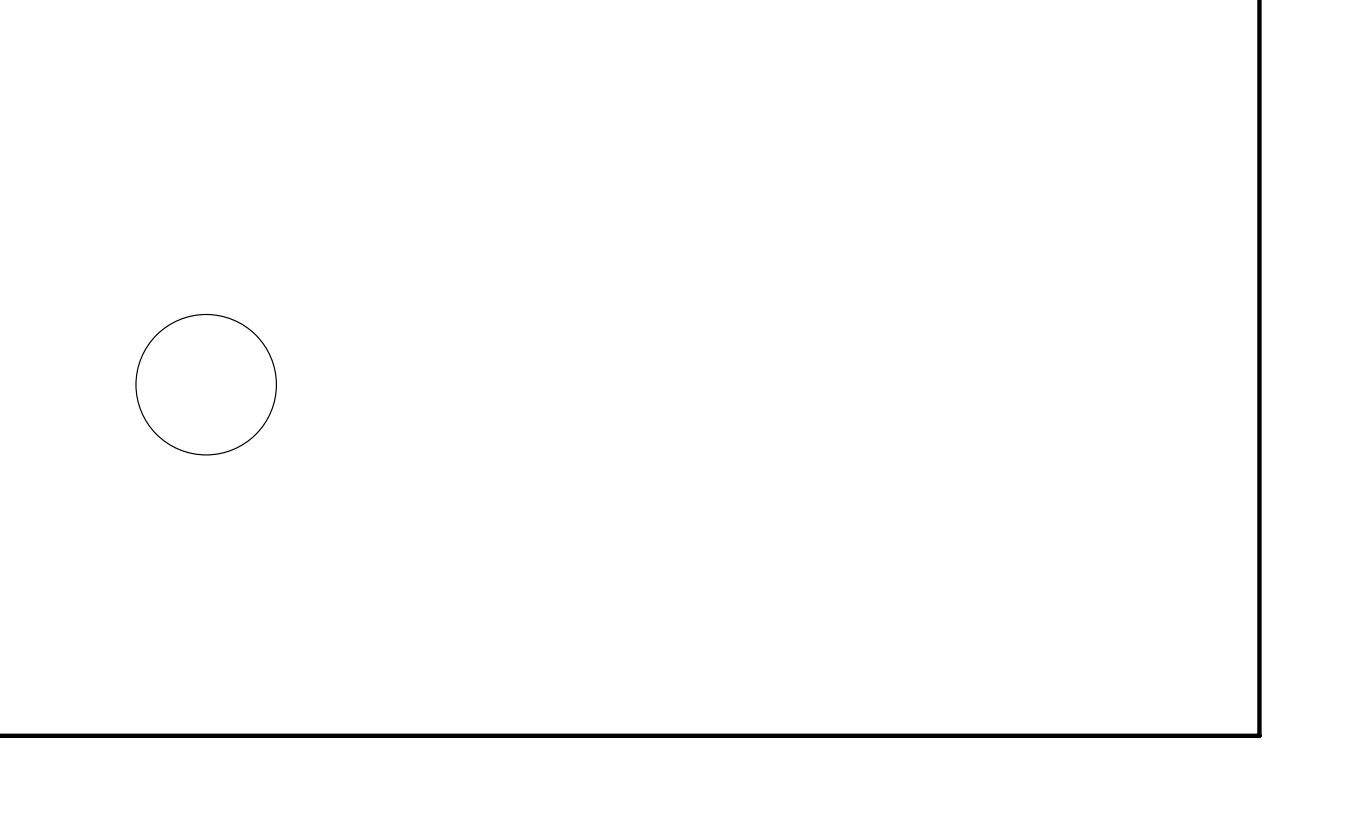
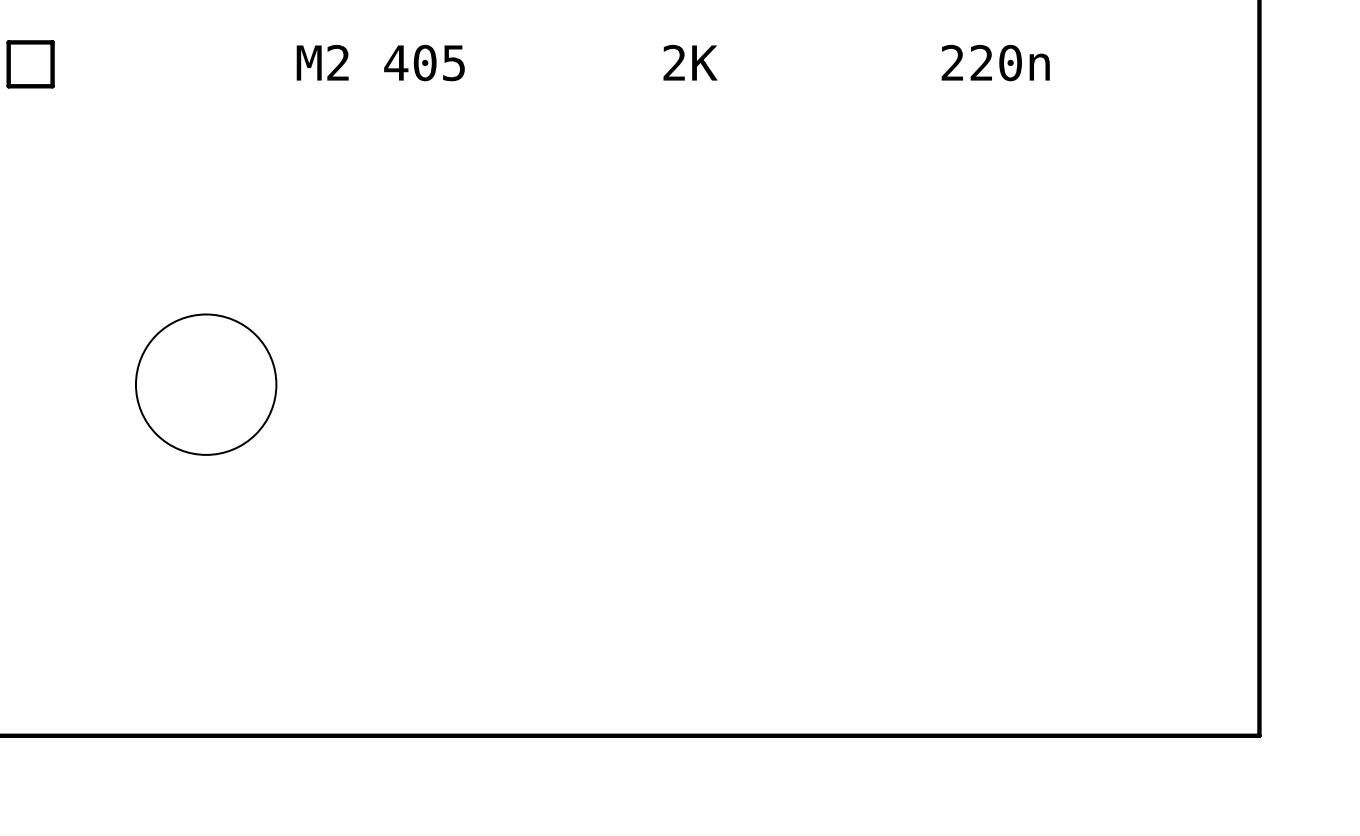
line: none -> (52, 42) (52, 86) (8, 86) (8, 42) (52, 42)
text: none -> M2 405 (380, 63)
text: none -> 2K (690, 62)
text: none -> 220n (995, 63)

